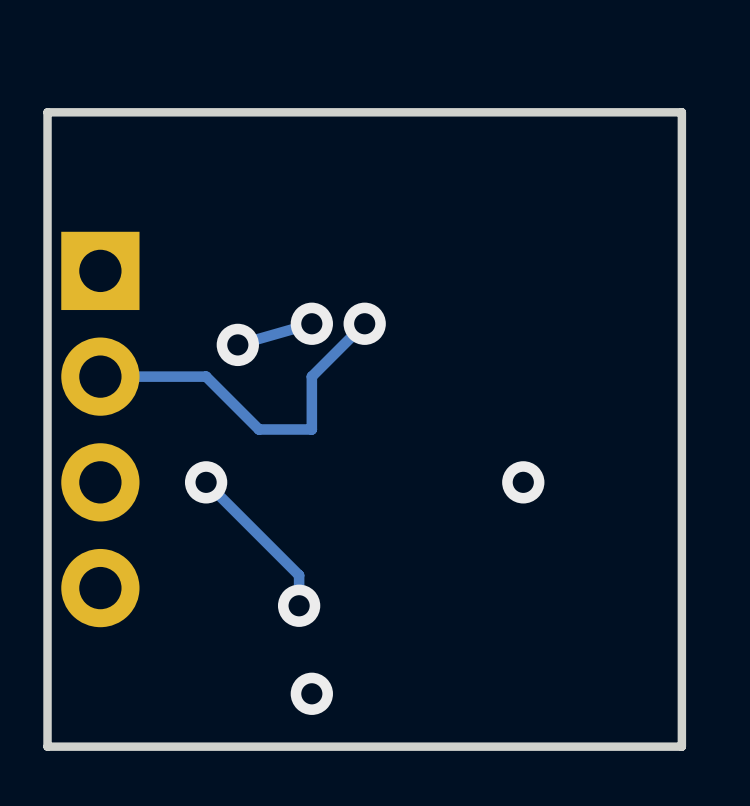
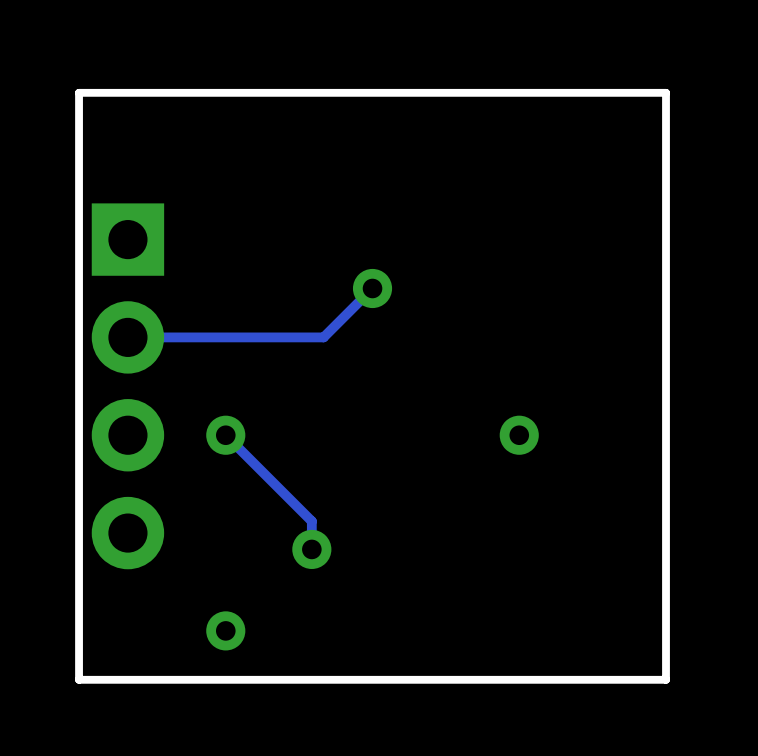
track: (311, 323) (237, 344) -> none
via: (311, 323) -> none
via: (237, 344) -> none
track: (311, 376) (311, 429) (258, 429) (206, 376) -> (323, 337) (225, 337)
via position: (311, 693) -> (225, 630)

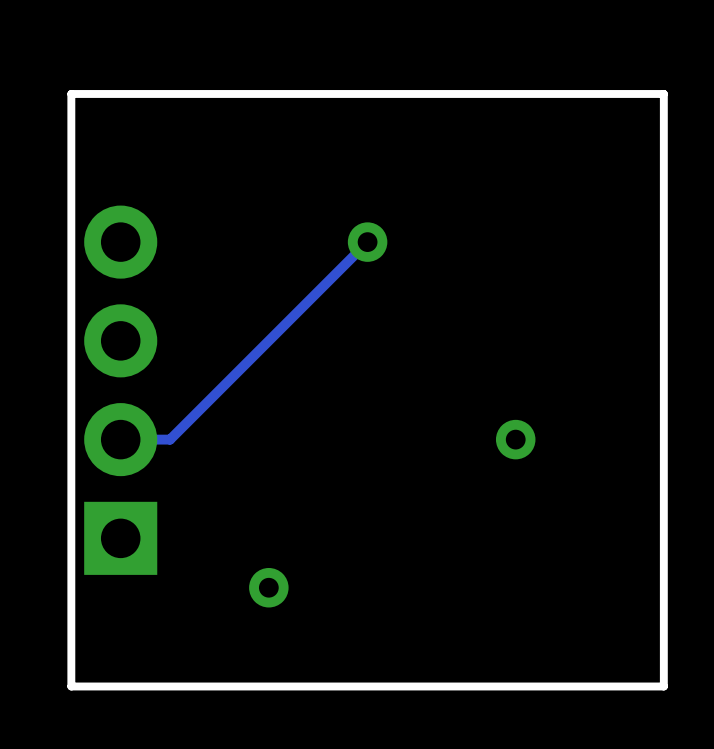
track: none -> (367, 242) (170, 439) (120, 439)
track: (372, 288) (323, 337) (127, 337) -> none
via position: (372, 288) -> (367, 242)
part rotation: 0° (127, 386) -> 180° (120, 390)
track: (225, 435) (311, 521) (311, 549) -> none
via: (225, 435) -> none
via: (311, 549) -> none
via: none -> (268, 587)
via: (225, 630) -> none

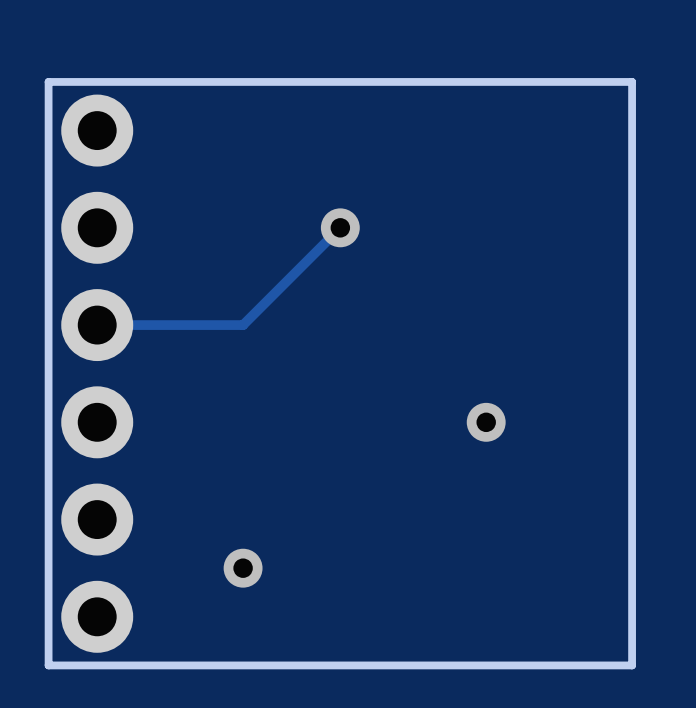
part footprint: [84, 205, 158, 575] -> [61, 94, 134, 653]
track: (268, 340) (170, 439) (120, 439) -> (243, 325) (97, 325)

